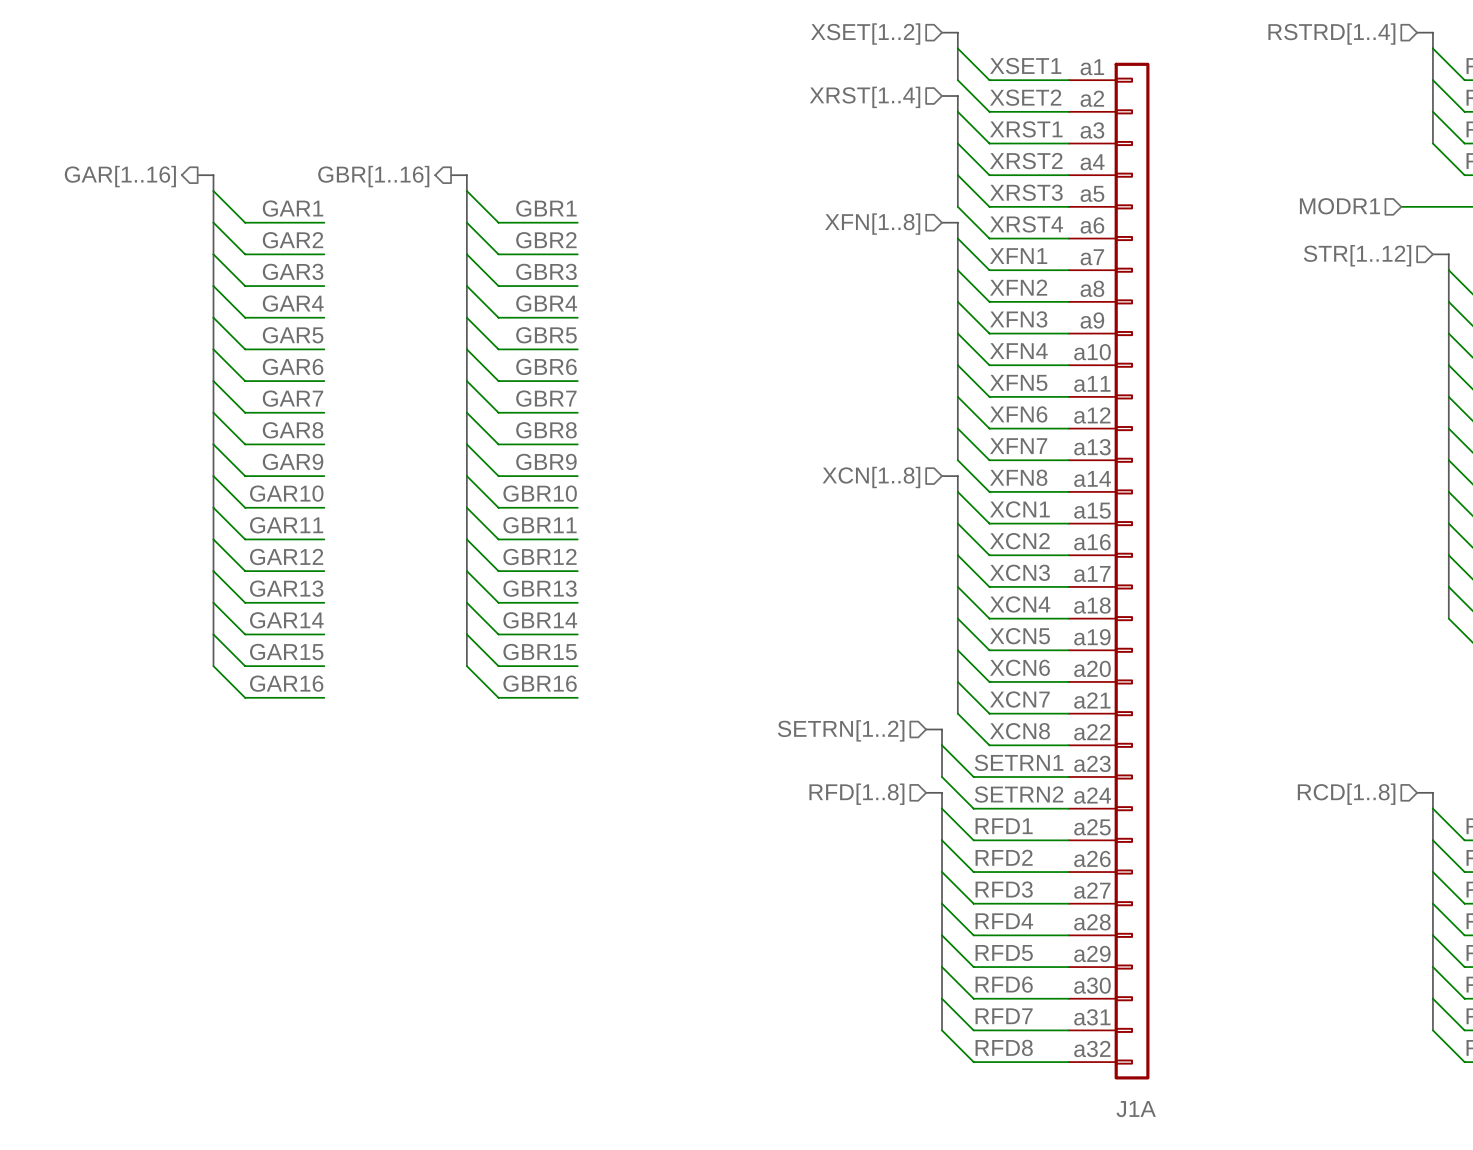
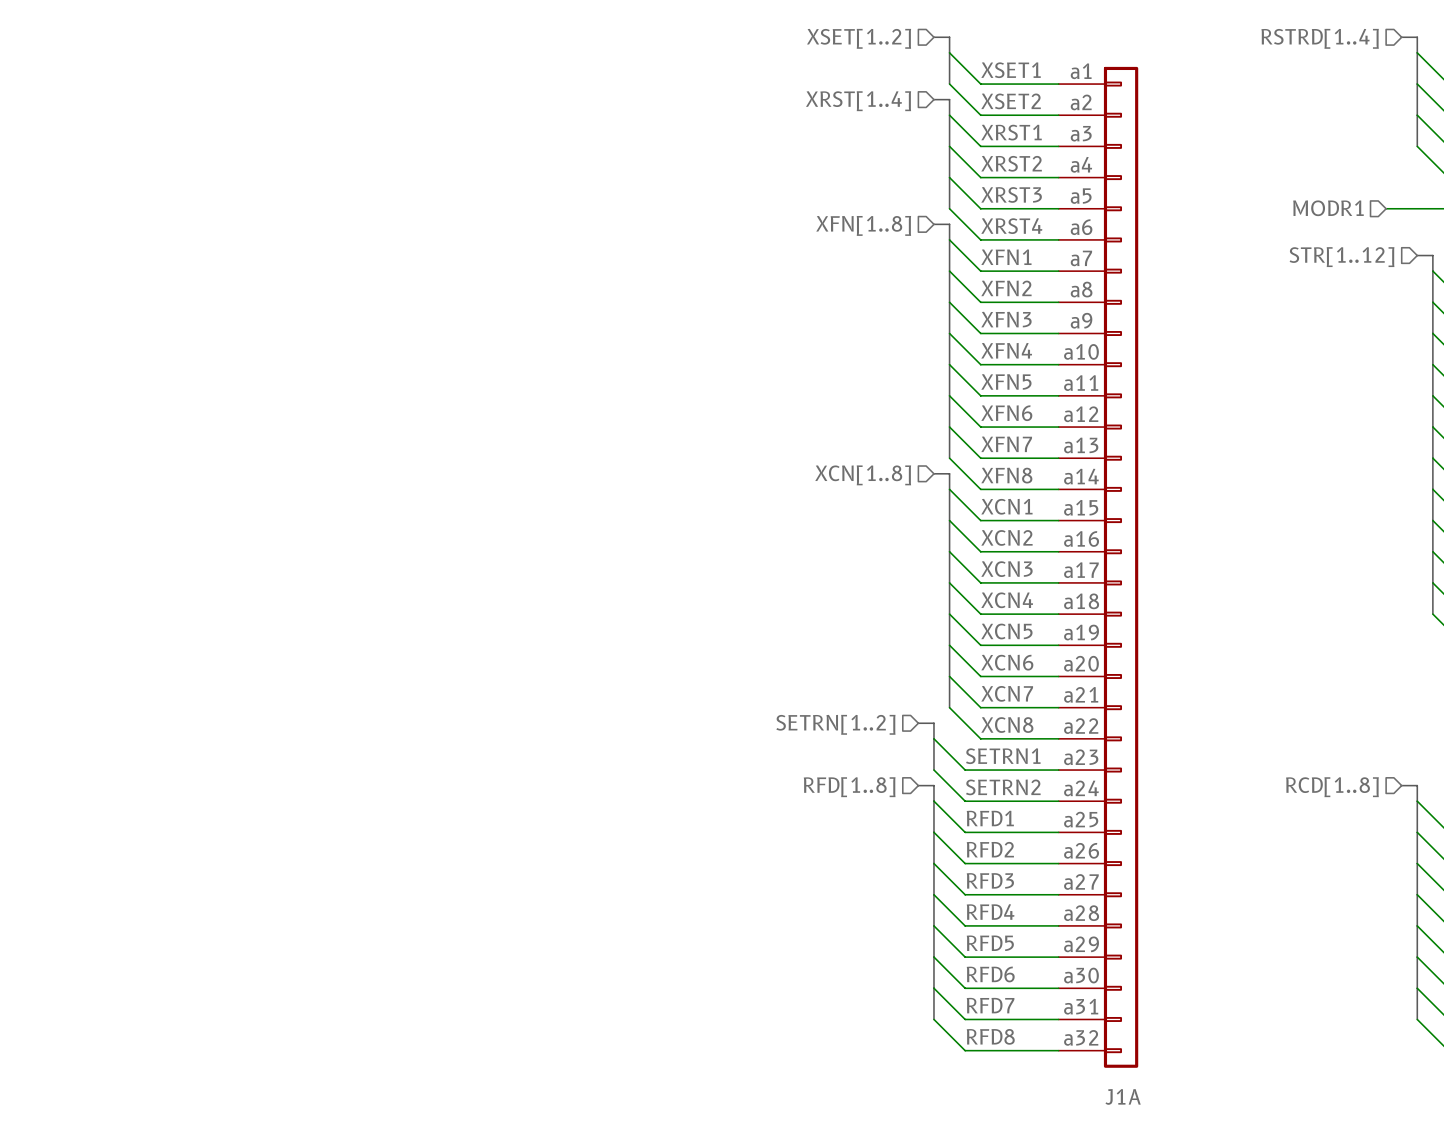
bus: (197, 175) (213, 175) (213, 666) -> none
bus: (451, 175) (466, 175) (466, 666) -> none
hierarchical label: GAR[1..16] (120, 176) -> none
hierarchical label: GBR[1..16] (373, 176) -> none
wire: (213, 191) (245, 222) (324, 222) -> none
wire: (466, 191) (498, 222) (577, 222) -> none
label: GAR1 (293, 208) -> none
label: GBR1 (546, 208) -> none
wire: (213, 222) (245, 254) (324, 254) -> none
wire: (466, 222) (498, 254) (577, 254) -> none
label: GAR2 (293, 240) -> none
label: GBR2 (546, 240) -> none
wire: (213, 254) (245, 286) (324, 286) -> none
wire: (466, 254) (498, 286) (577, 286) -> none
label: GAR3 (293, 271) -> none
label: GBR3 (546, 271) -> none
wire: (213, 286) (245, 317) (324, 317) -> none
wire: (466, 286) (498, 317) (577, 317) -> none
label: GAR4 (293, 303) -> none
label: GBR4 (546, 303) -> none
wire: (213, 317) (245, 349) (324, 349) -> none
wire: (466, 317) (498, 349) (577, 349) -> none
label: GAR5 (293, 335) -> none
label: GBR5 (546, 335) -> none
wire: (213, 349) (245, 381) (324, 381) -> none
wire: (466, 349) (498, 381) (577, 381) -> none
label: GAR6 (293, 366) -> none
label: GBR6 (546, 366) -> none
wire: (213, 381) (245, 412) (324, 412) -> none
wire: (466, 381) (498, 412) (577, 412) -> none
label: GAR7 (293, 398) -> none
label: GBR7 (546, 398) -> none
wire: (213, 412) (245, 444) (324, 444) -> none
wire: (466, 412) (498, 444) (577, 444) -> none
label: GAR8 (293, 430) -> none
label: GBR8 (546, 430) -> none
wire: (213, 444) (245, 476) (324, 476) -> none
wire: (466, 444) (498, 476) (577, 476) -> none
label: GAR9 (293, 461) -> none
label: GBR9 (546, 461) -> none
wire: (213, 476) (245, 507) (324, 507) -> none
wire: (466, 476) (498, 507) (577, 507) -> none
label: GAR10 (286, 493) -> none
label: GBR10 (540, 493) -> none
wire: (213, 507) (245, 539) (324, 539) -> none
wire: (466, 507) (498, 539) (577, 539) -> none
label: GAR11 (286, 525) -> none
label: GBR11 (540, 525) -> none
wire: (213, 539) (245, 571) (324, 571) -> none
wire: (466, 539) (498, 571) (577, 571) -> none
label: GAR12 (286, 556) -> none
label: GBR12 (540, 556) -> none
wire: (213, 571) (245, 602) (324, 602) -> none
wire: (466, 571) (498, 602) (577, 602) -> none
label: GAR13 (286, 588) -> none
label: GBR13 (540, 588) -> none
wire: (213, 602) (245, 634) (324, 634) -> none
wire: (466, 602) (498, 634) (577, 634) -> none
label: GAR14 (286, 620) -> none
label: GBR14 (540, 620) -> none
wire: (213, 634) (245, 666) (324, 666) -> none
wire: (466, 634) (498, 666) (577, 666) -> none
label: GAR15 (286, 652) -> none
label: GBR15 (540, 652) -> none
wire: (213, 666) (245, 697) (324, 697) -> none
wire: (466, 666) (498, 697) (577, 697) -> none
label: GAR16 (286, 683) -> none
label: GBR16 (540, 683) -> none

